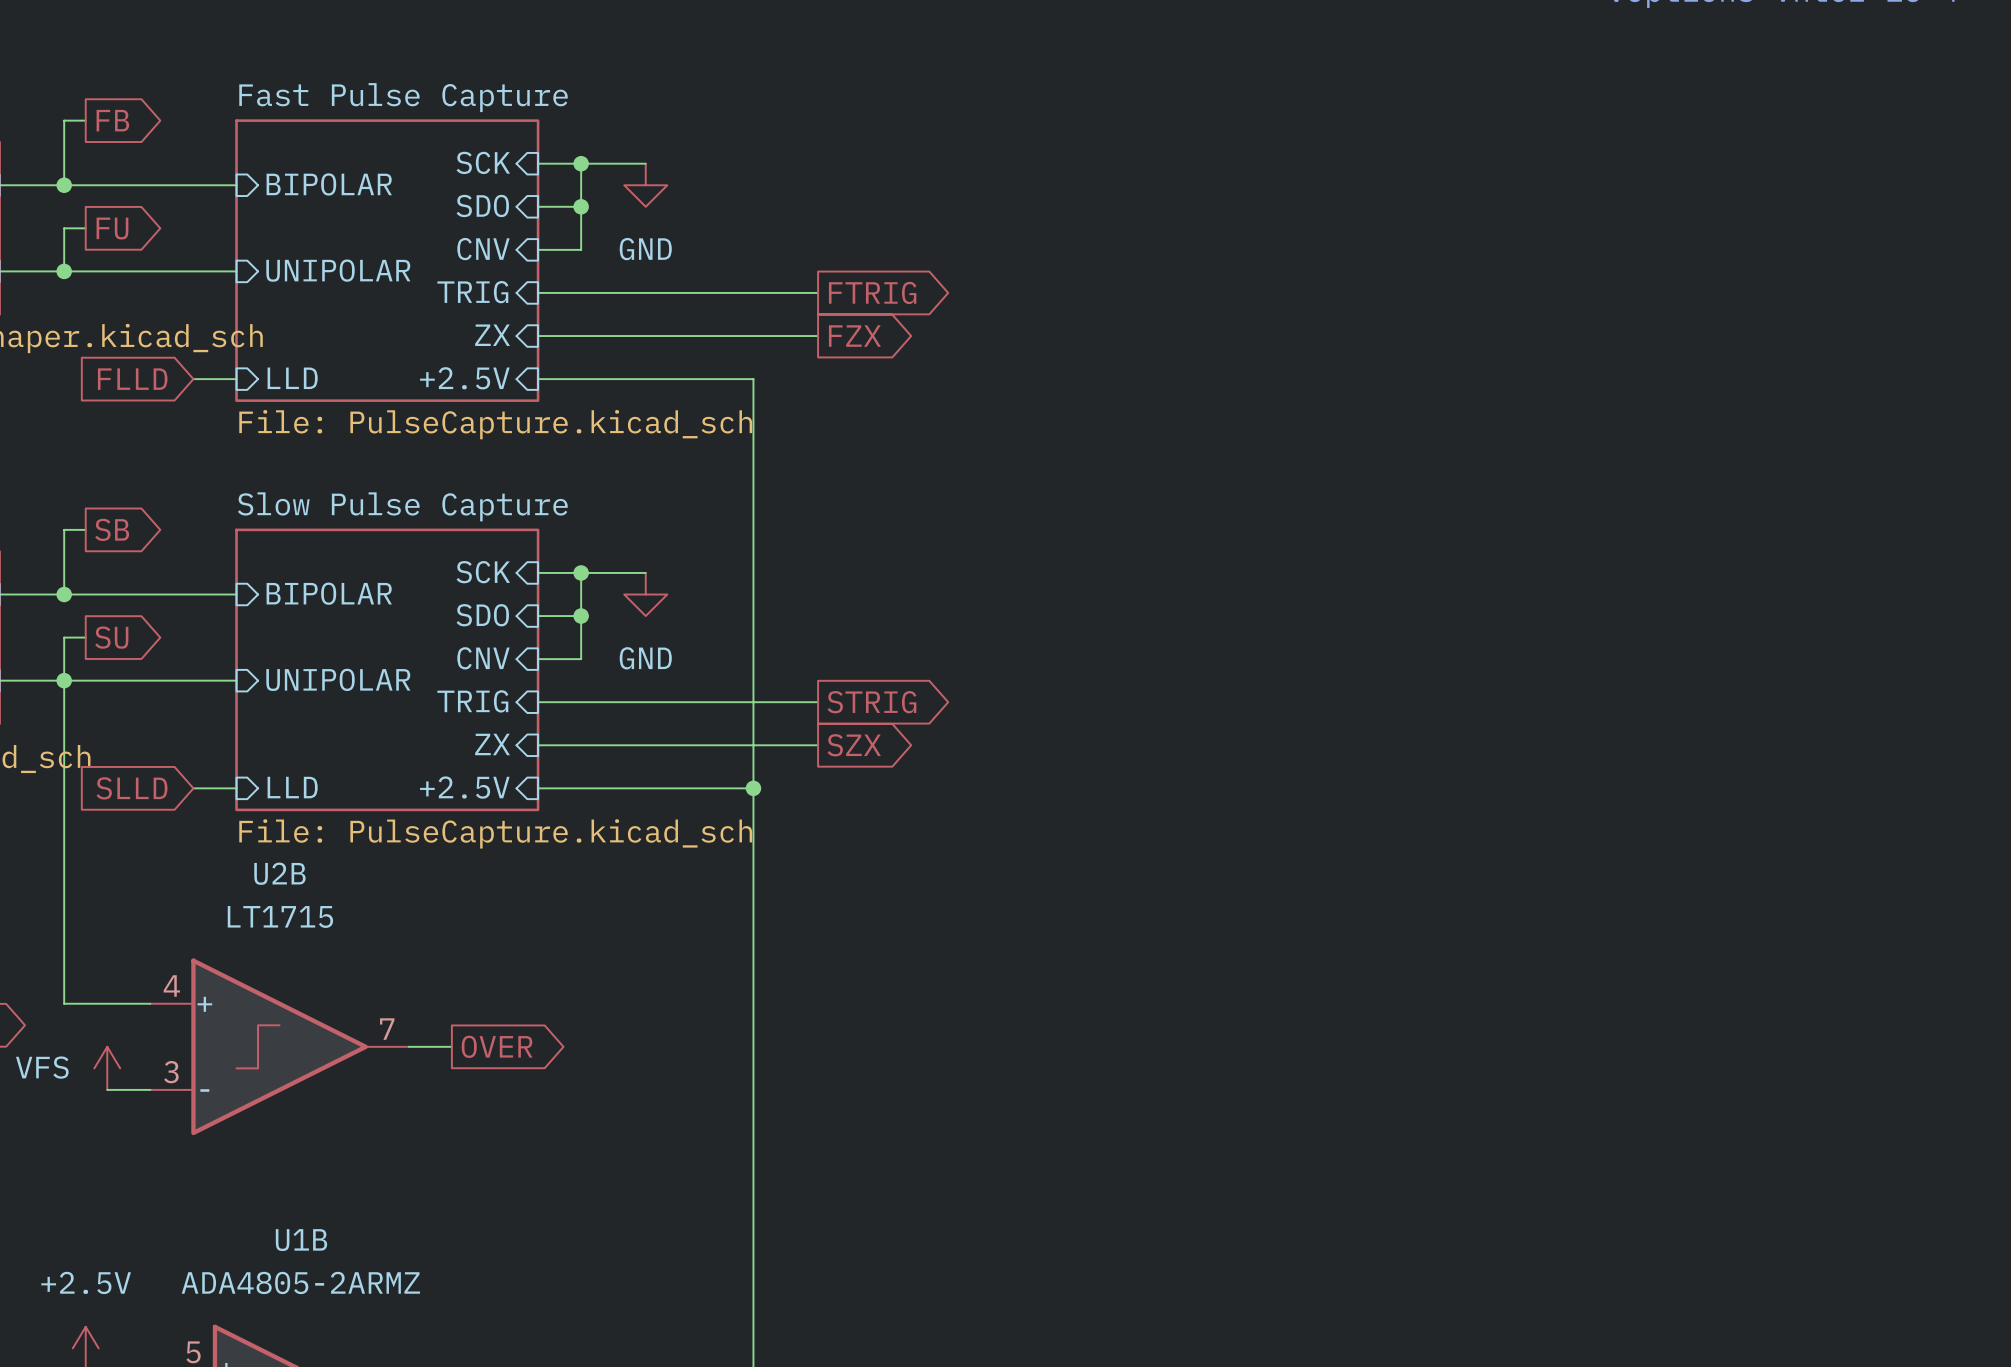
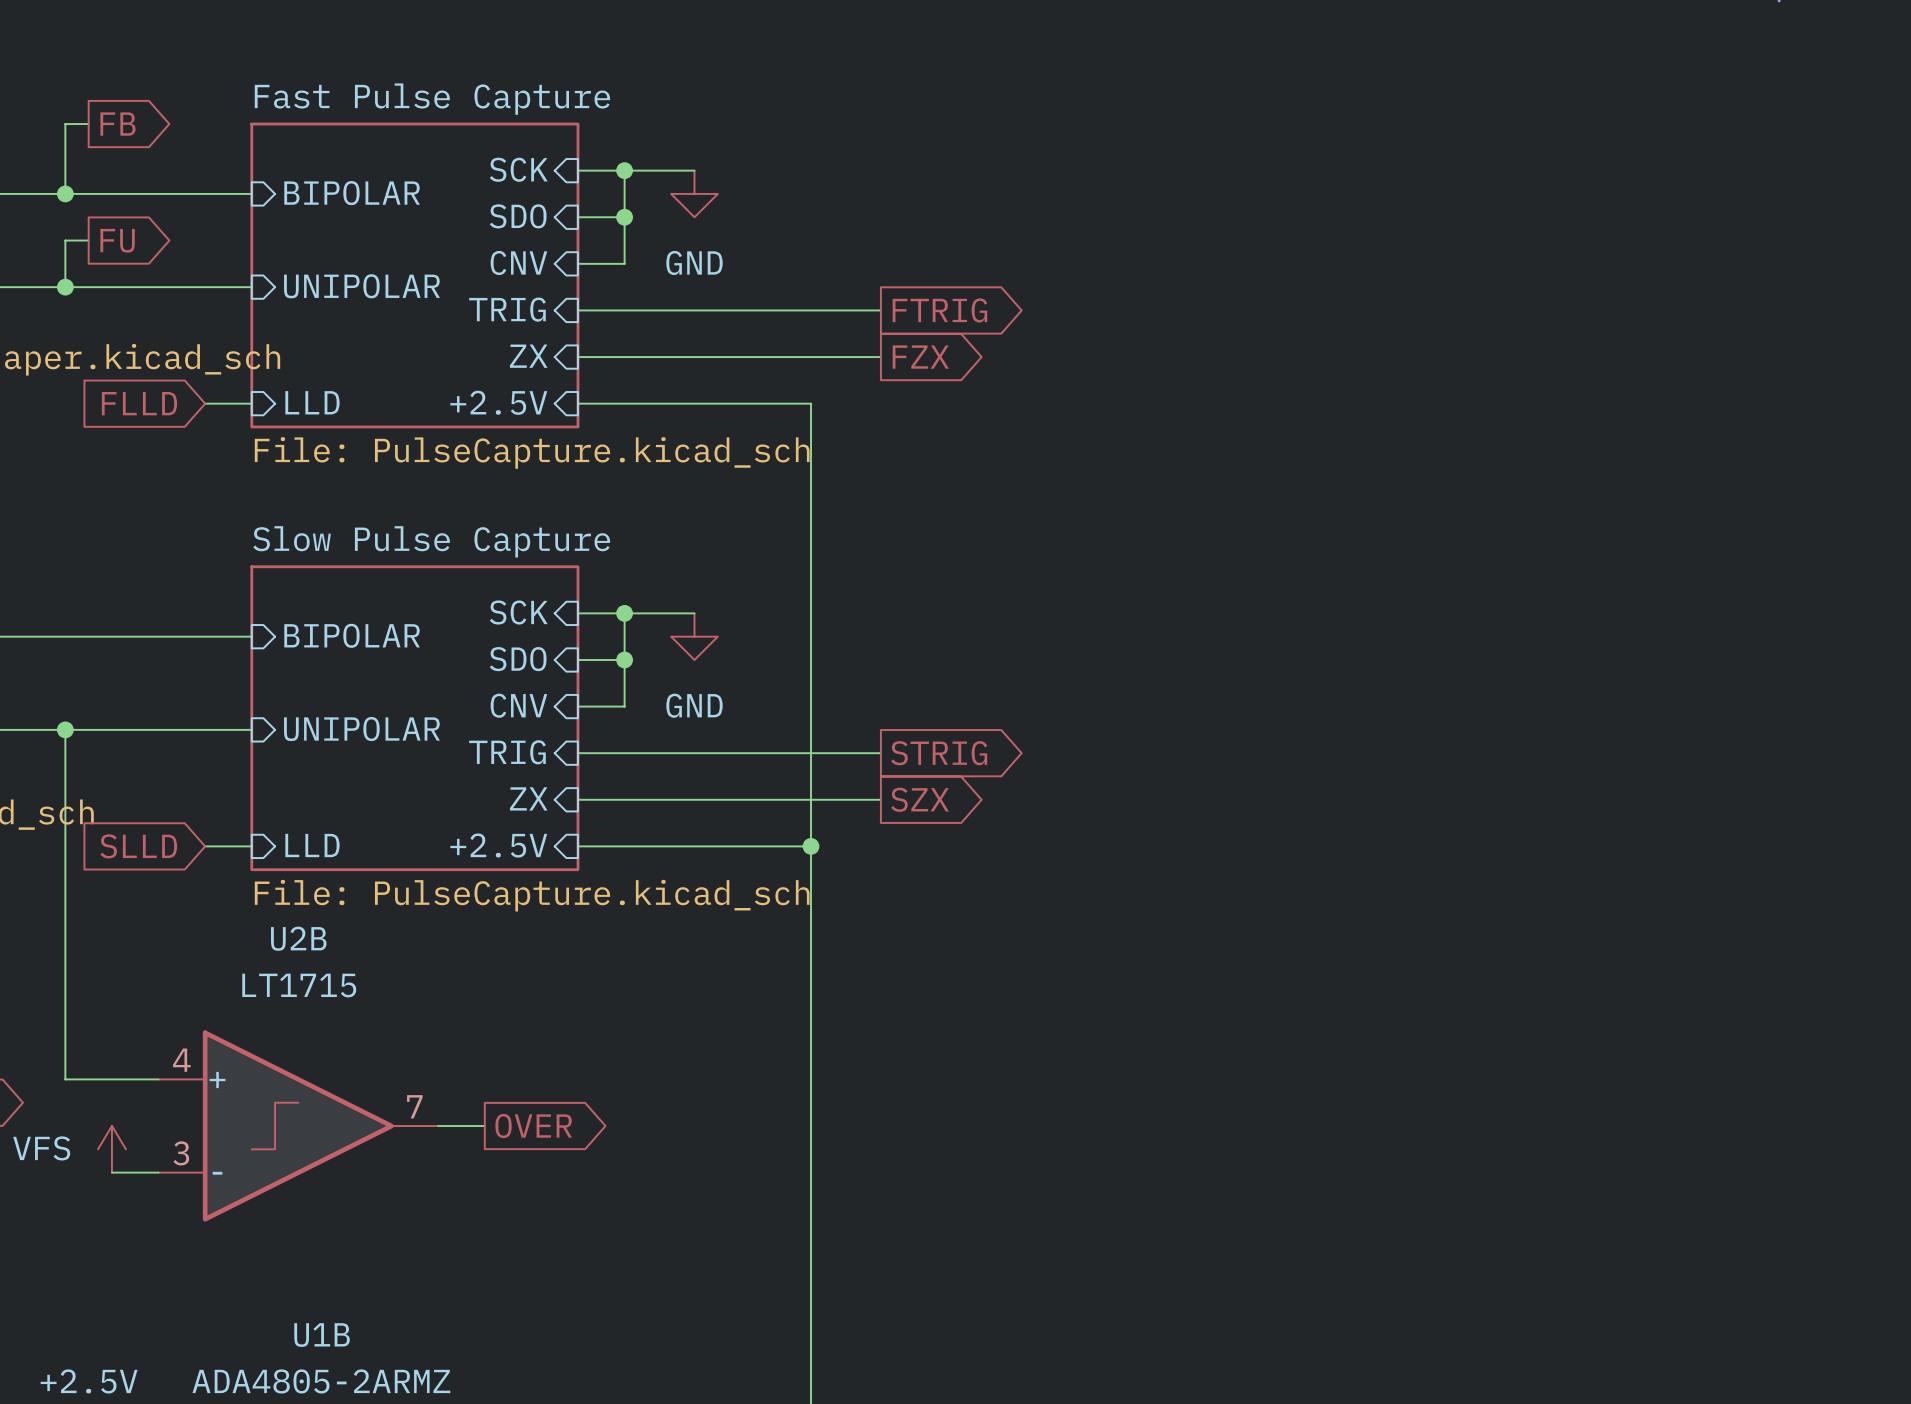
wire: (85, 529) (64, 529) (64, 594) -> none
global label: SB (112, 529) -> none
junction: (64, 594) -> none
wire: (85, 637) (64, 637) (64, 680) -> none
global label: SU (111, 637) -> none

